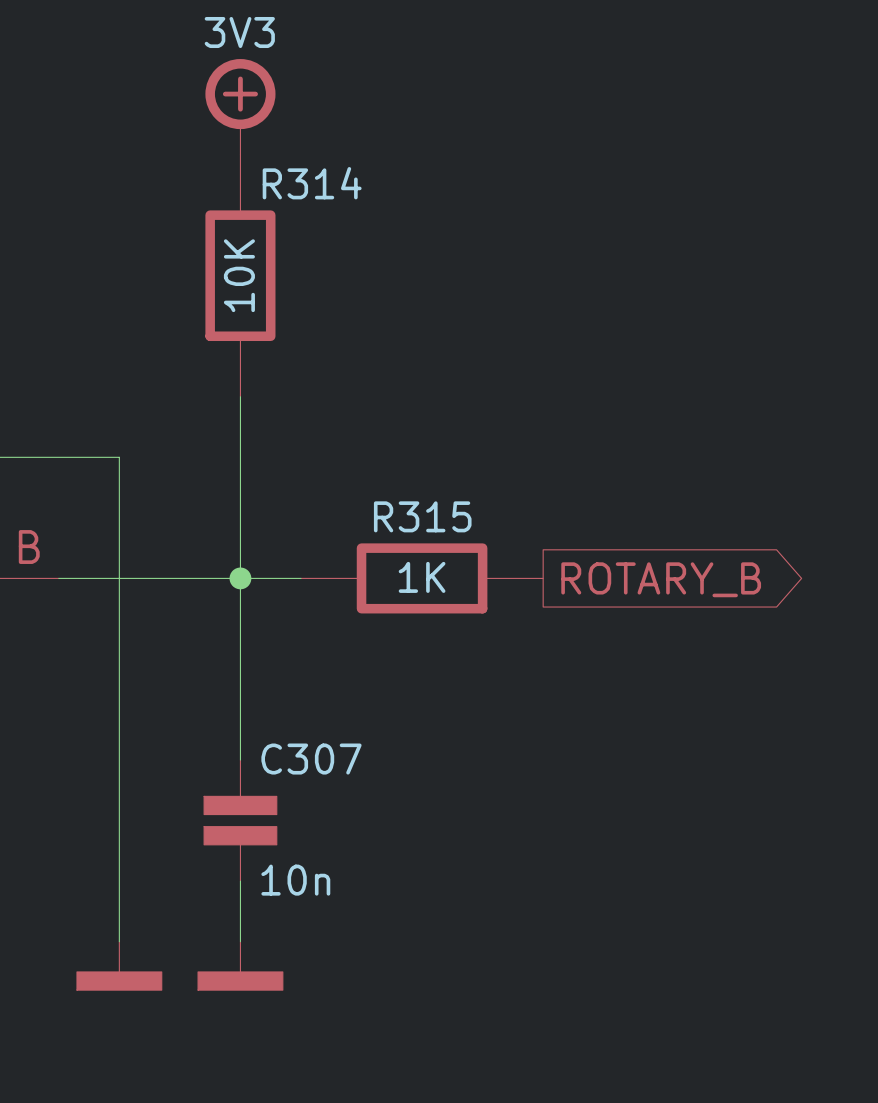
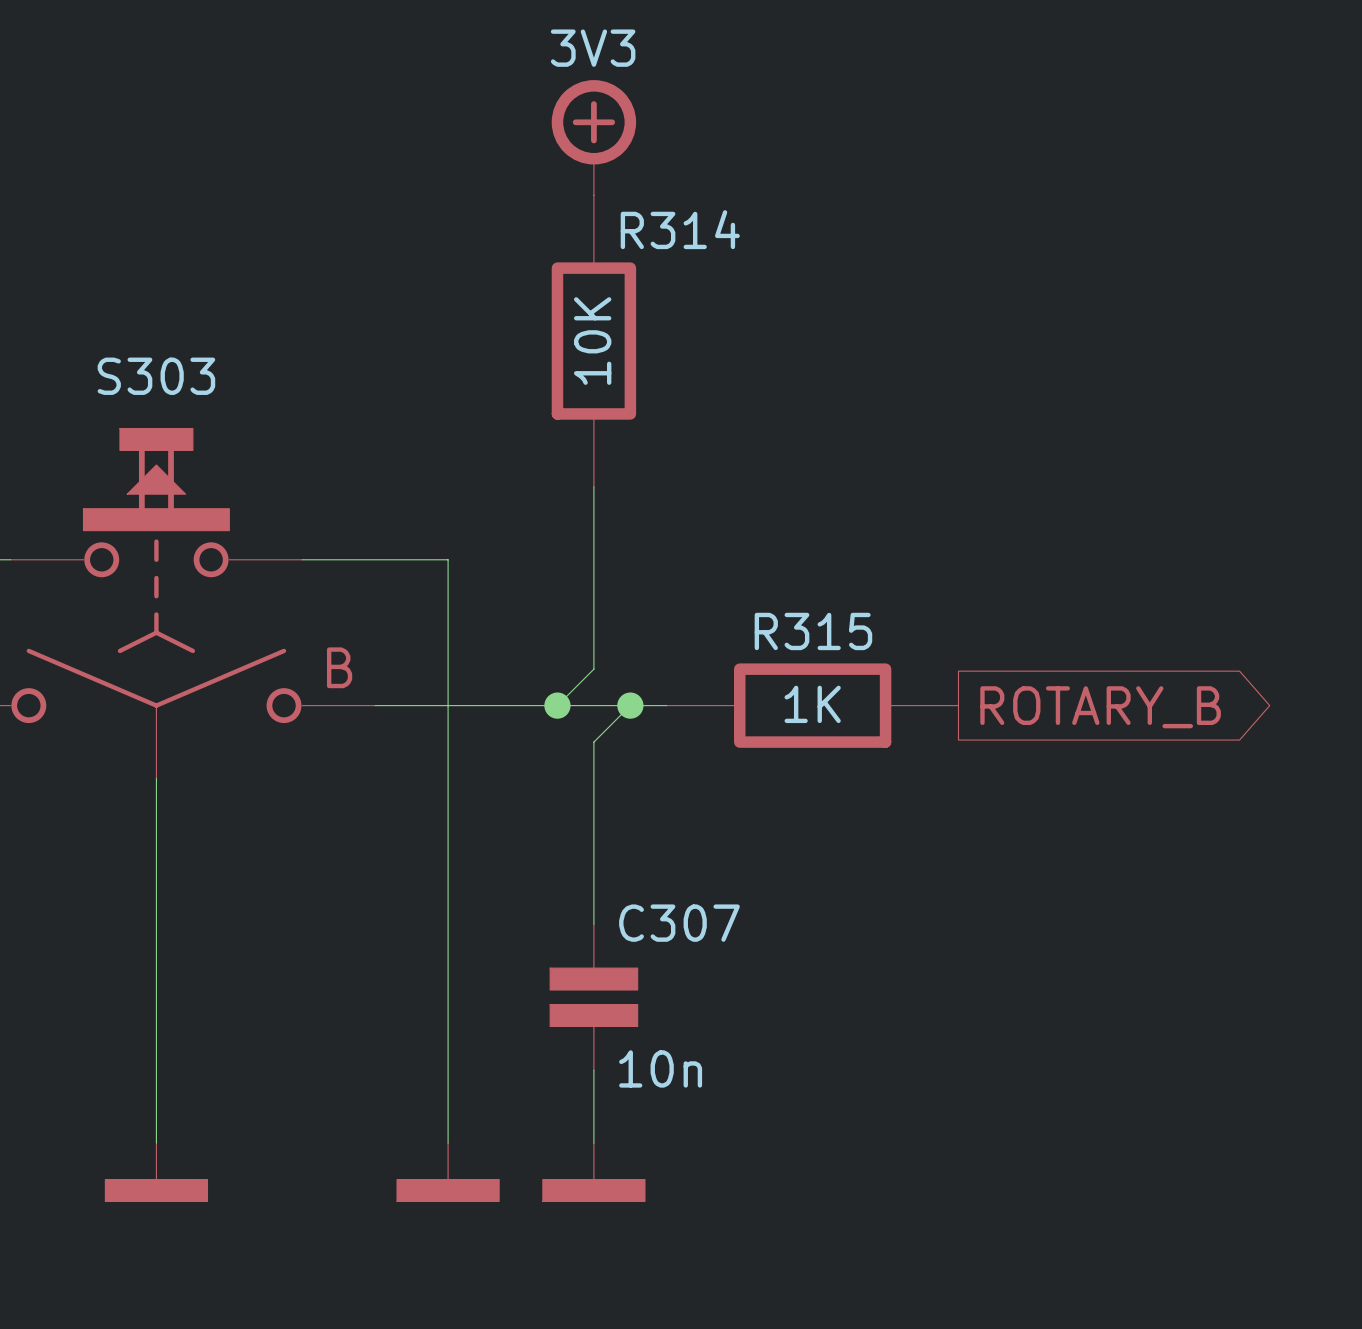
wire: (240, 548) (240, 608) -> (593, 669) (557, 705)
junction: none -> (557, 705)
junction: (240, 578) -> none
wire: none -> (630, 705) (593, 742)
junction: none -> (630, 705)

